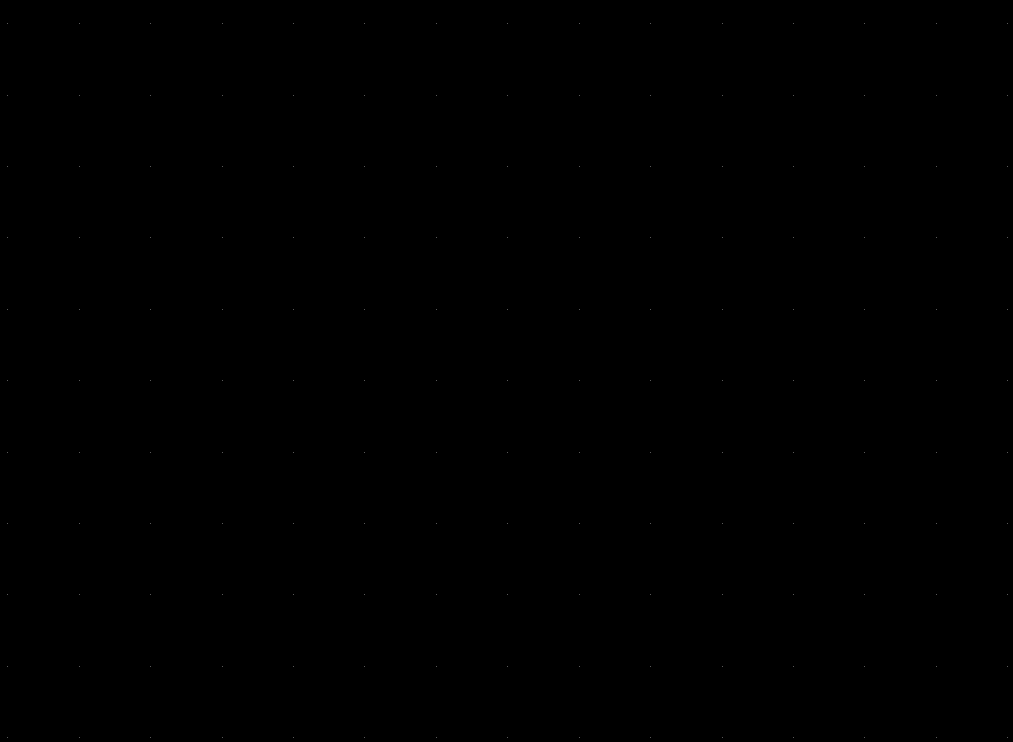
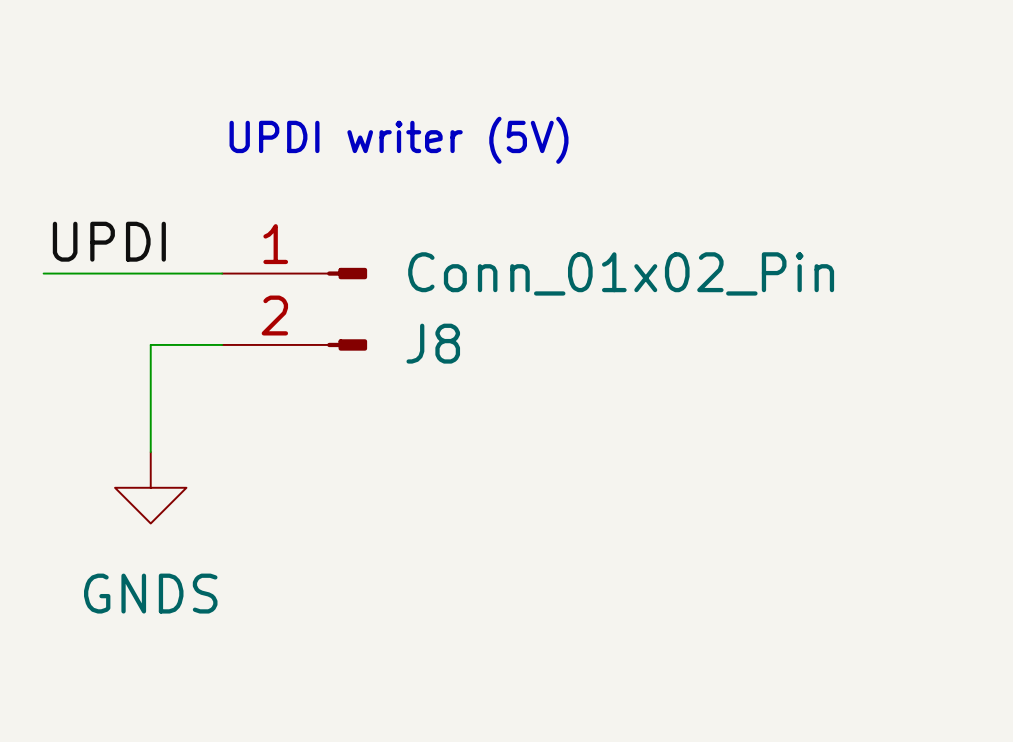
text: none -> UPDI writer (5V) (399, 140)
label: none -> UPDI (109, 241)
wire: none -> (43, 273) (222, 273)
J8: none -> Conn_01x02_Pin (294, 309)
wire: none -> (222, 344) (150, 344) (150, 452)
power symbol: none -> GNDS (150, 487)

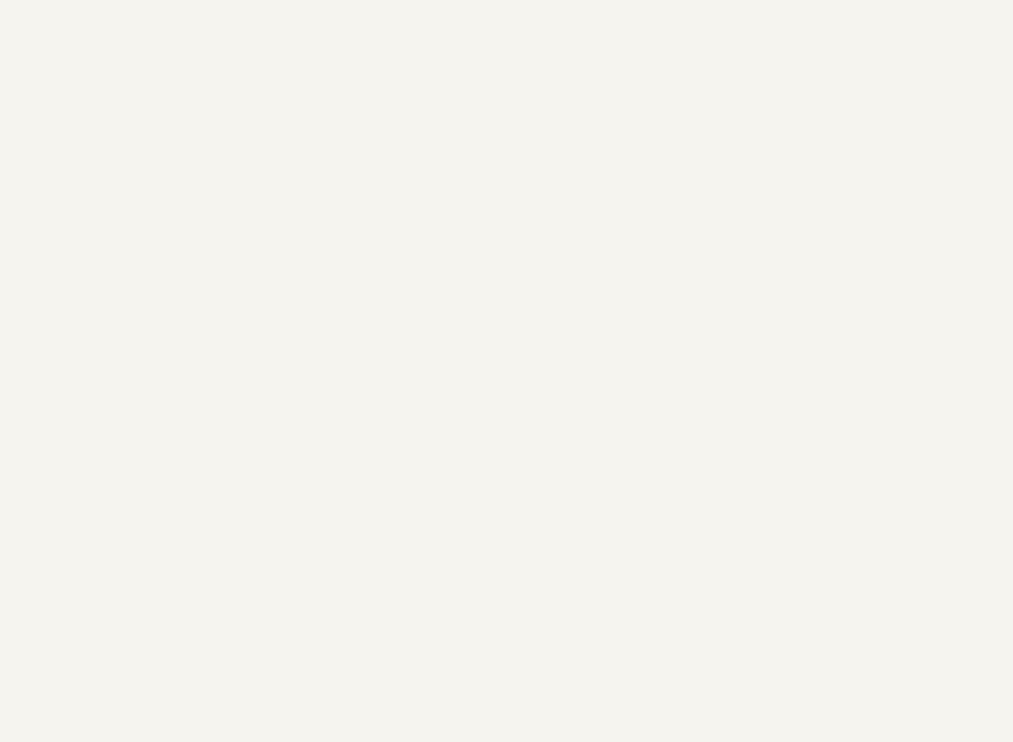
text: UPDI writer (5V) (399, 140) -> none
label: UPDI (109, 241) -> none
wire: (43, 273) (222, 273) -> none
J8: Conn_01x02_Pin (294, 309) -> none
wire: (222, 344) (150, 344) (150, 452) -> none
power symbol: GNDS (150, 487) -> none

